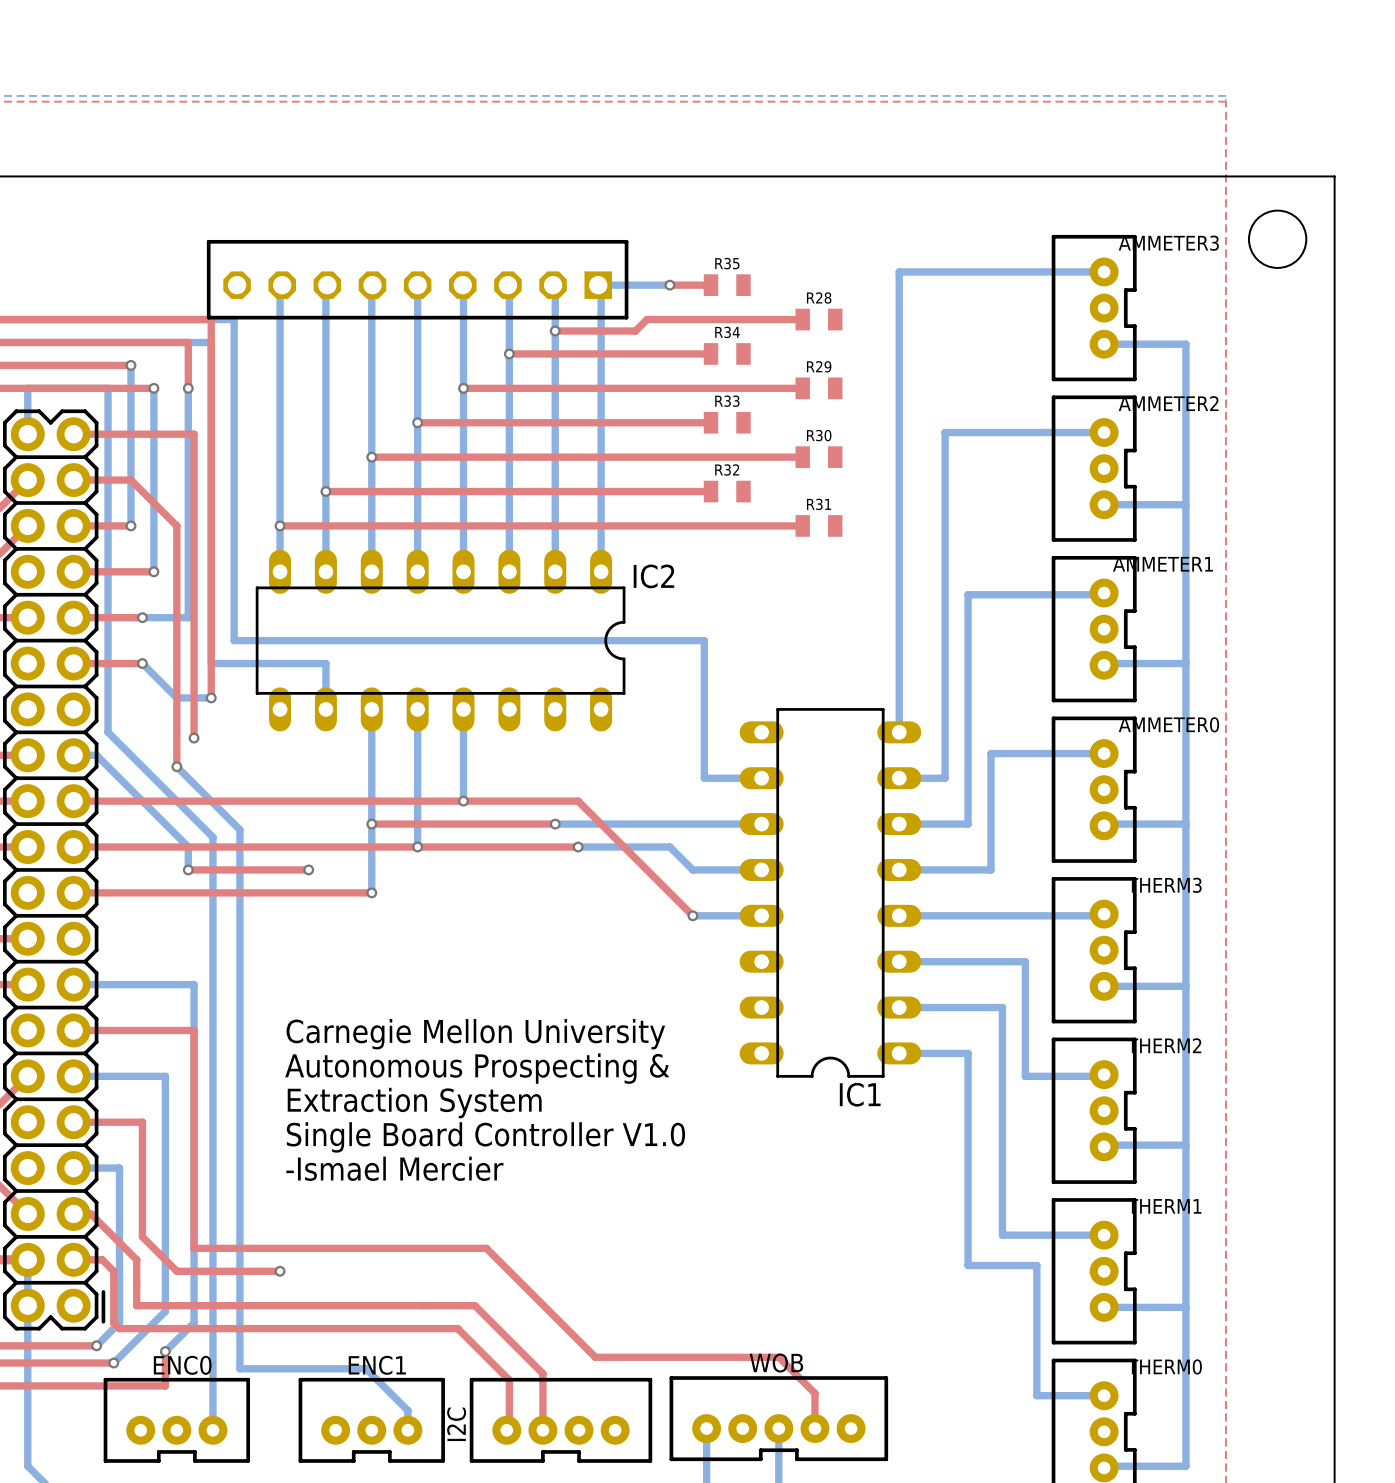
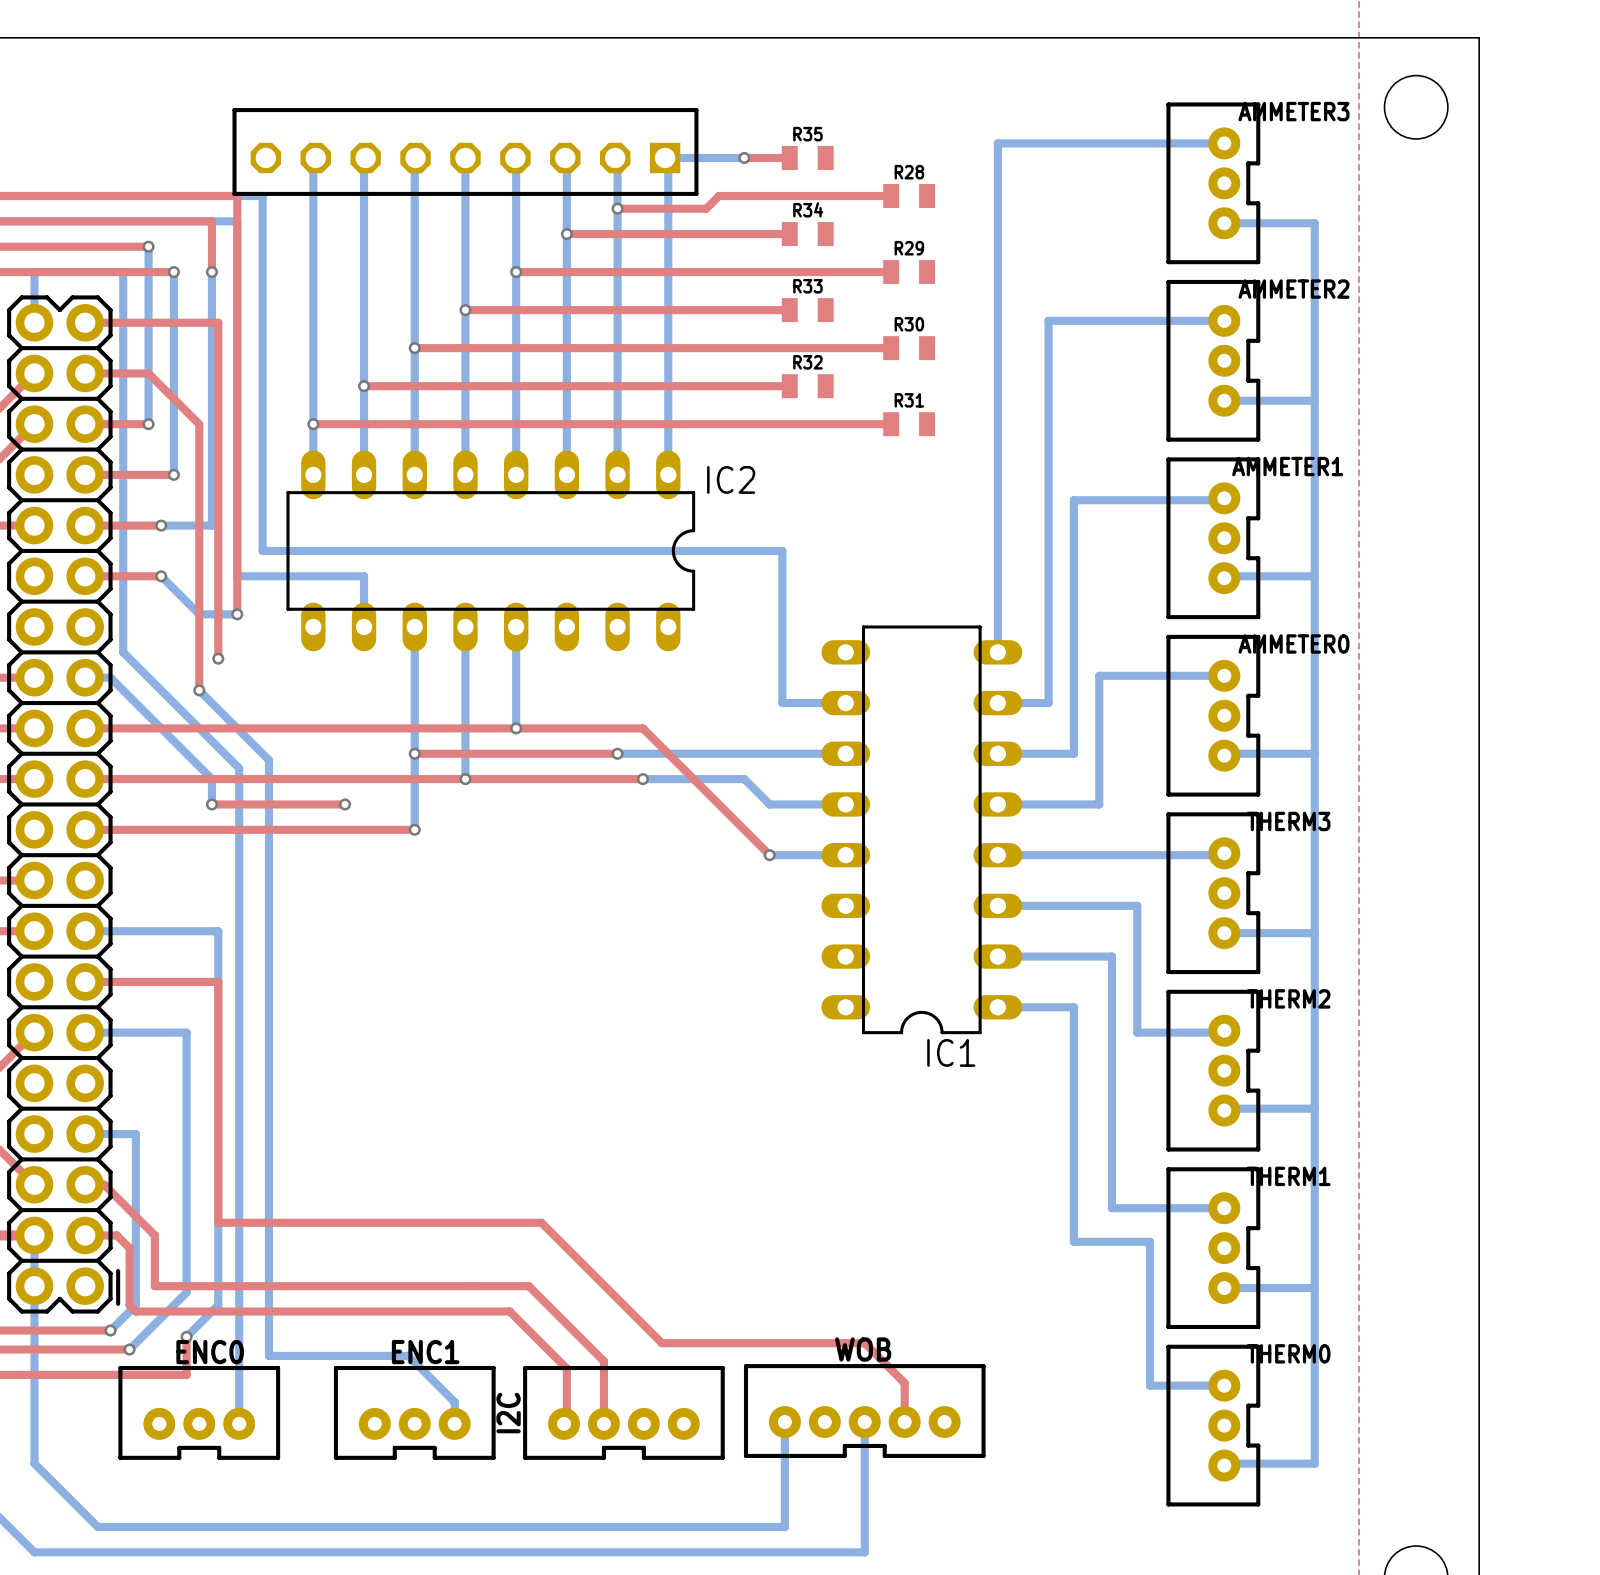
text: Carnegie Mellon University (475, 1034) -> none
text: Autonomous Prospecting & (477, 1068) -> none
text: Extraction System (414, 1103) -> none
top track: (73, 1122) (142, 1122) (142, 1236) (176, 1271) (280, 1271) -> none
text: Single Board Controller V1.0 (485, 1137) -> none
text: -Ismael Mercier (394, 1168) -> none
via: (280, 1271) -> none

